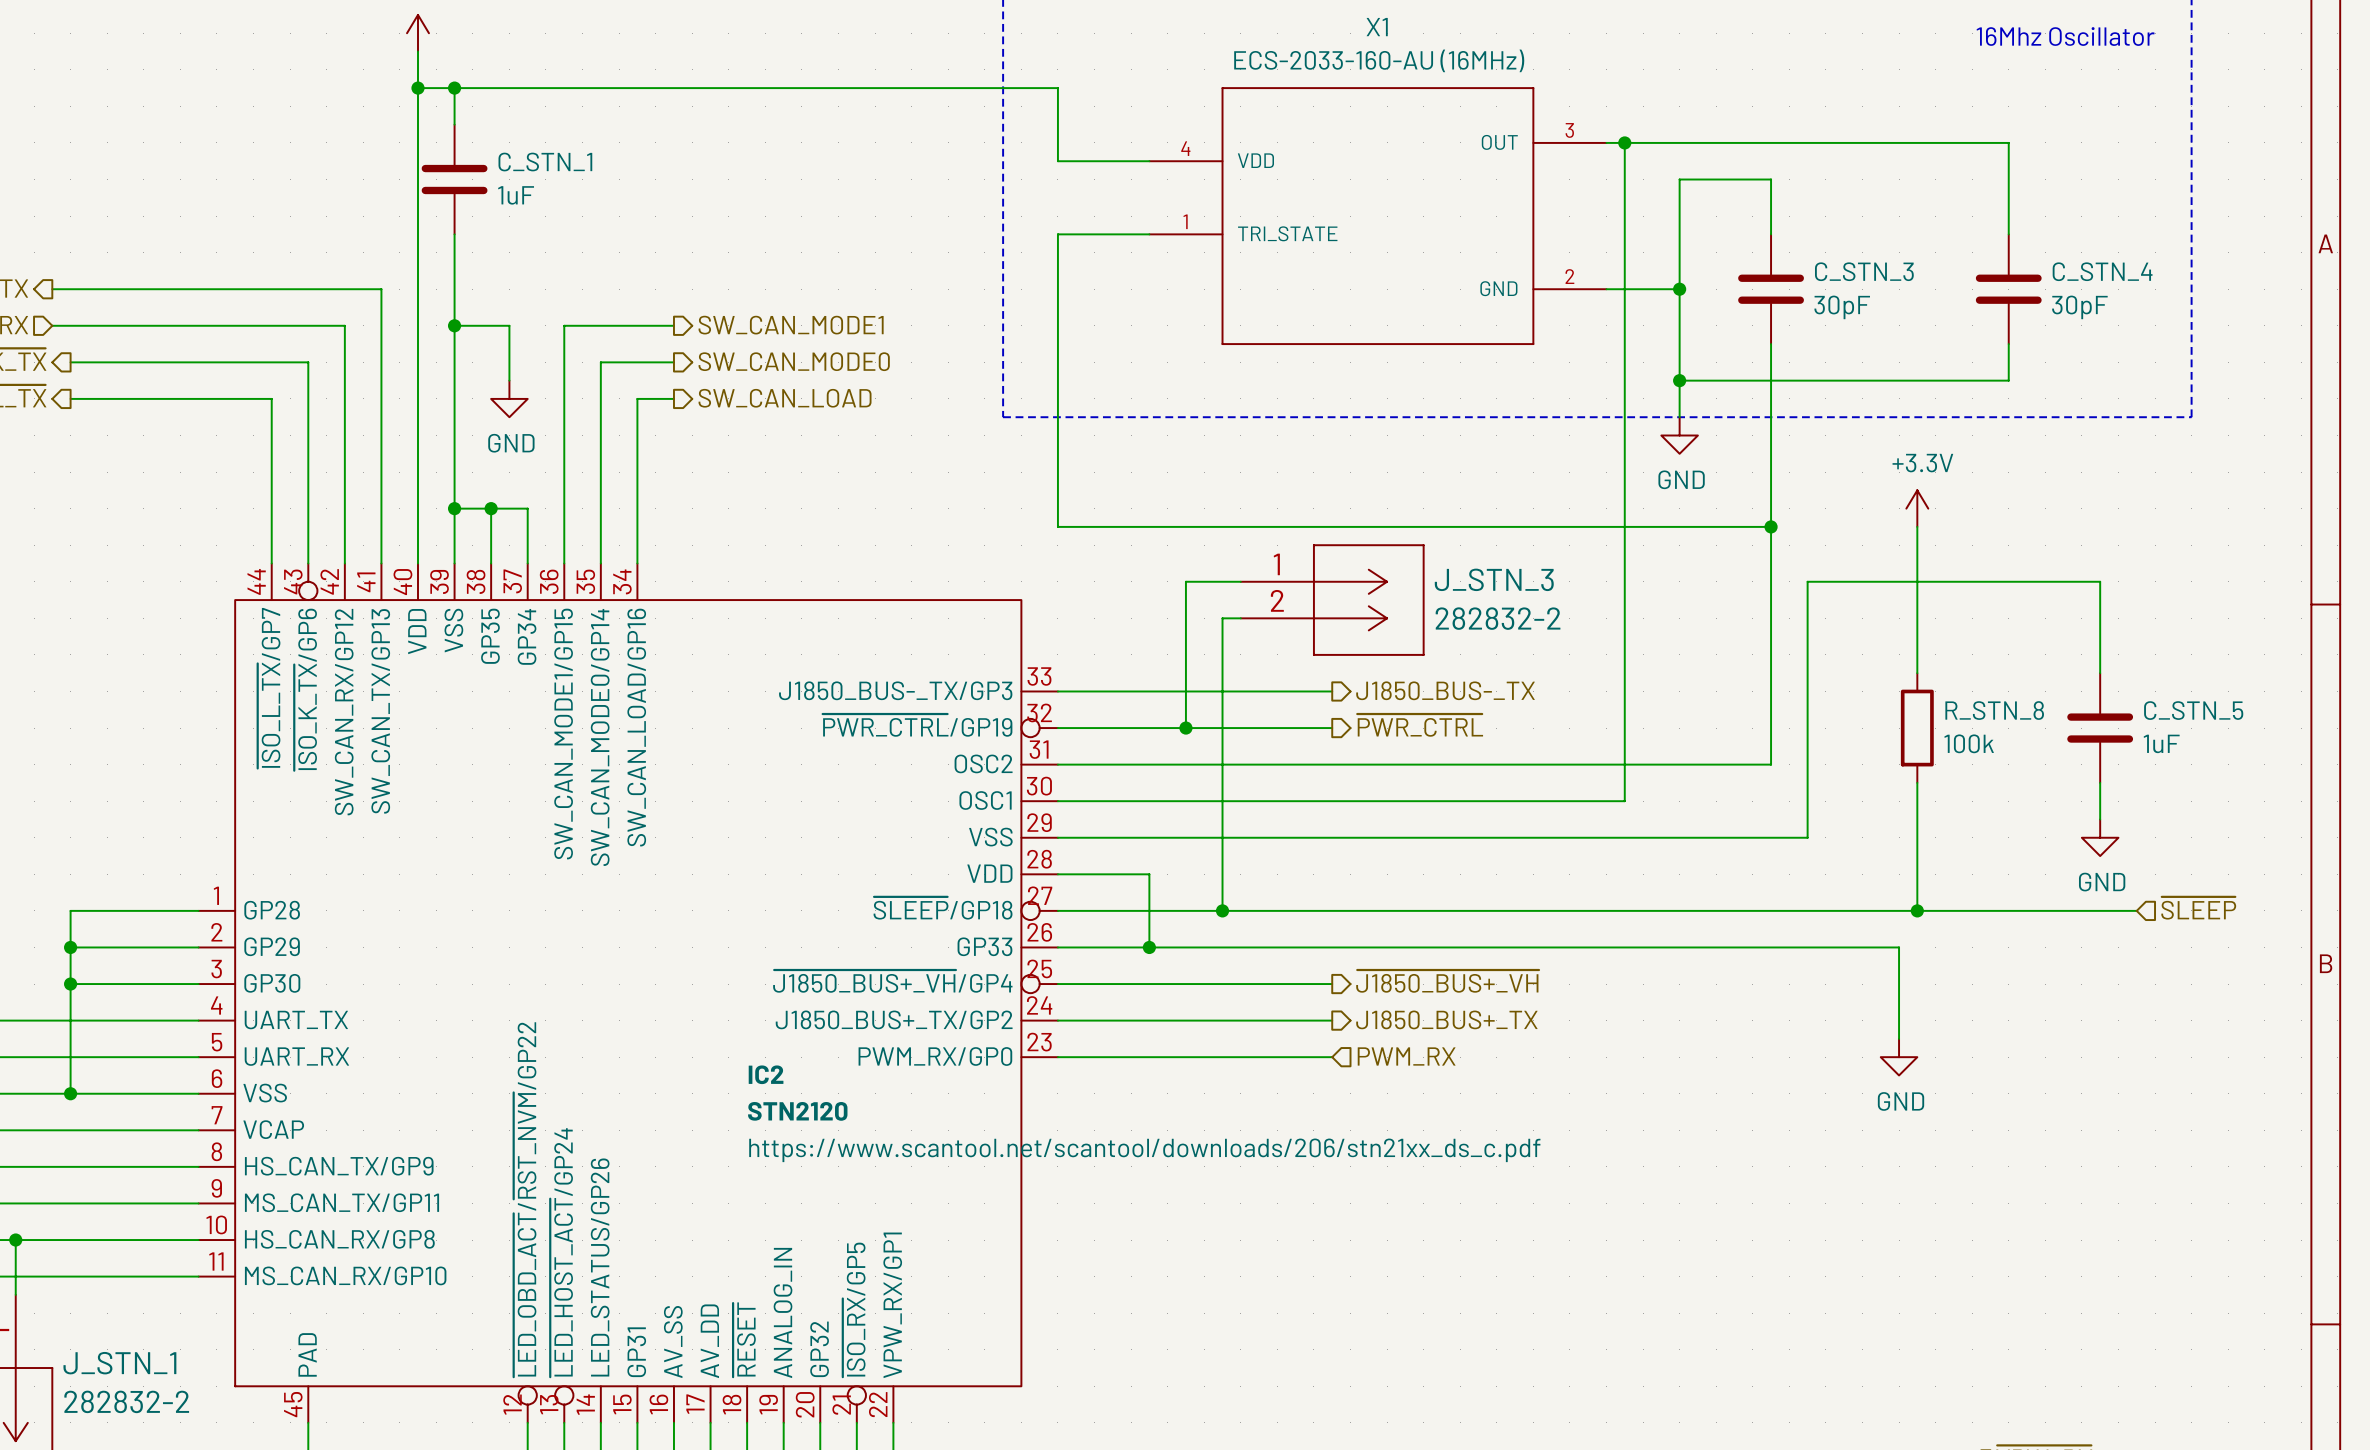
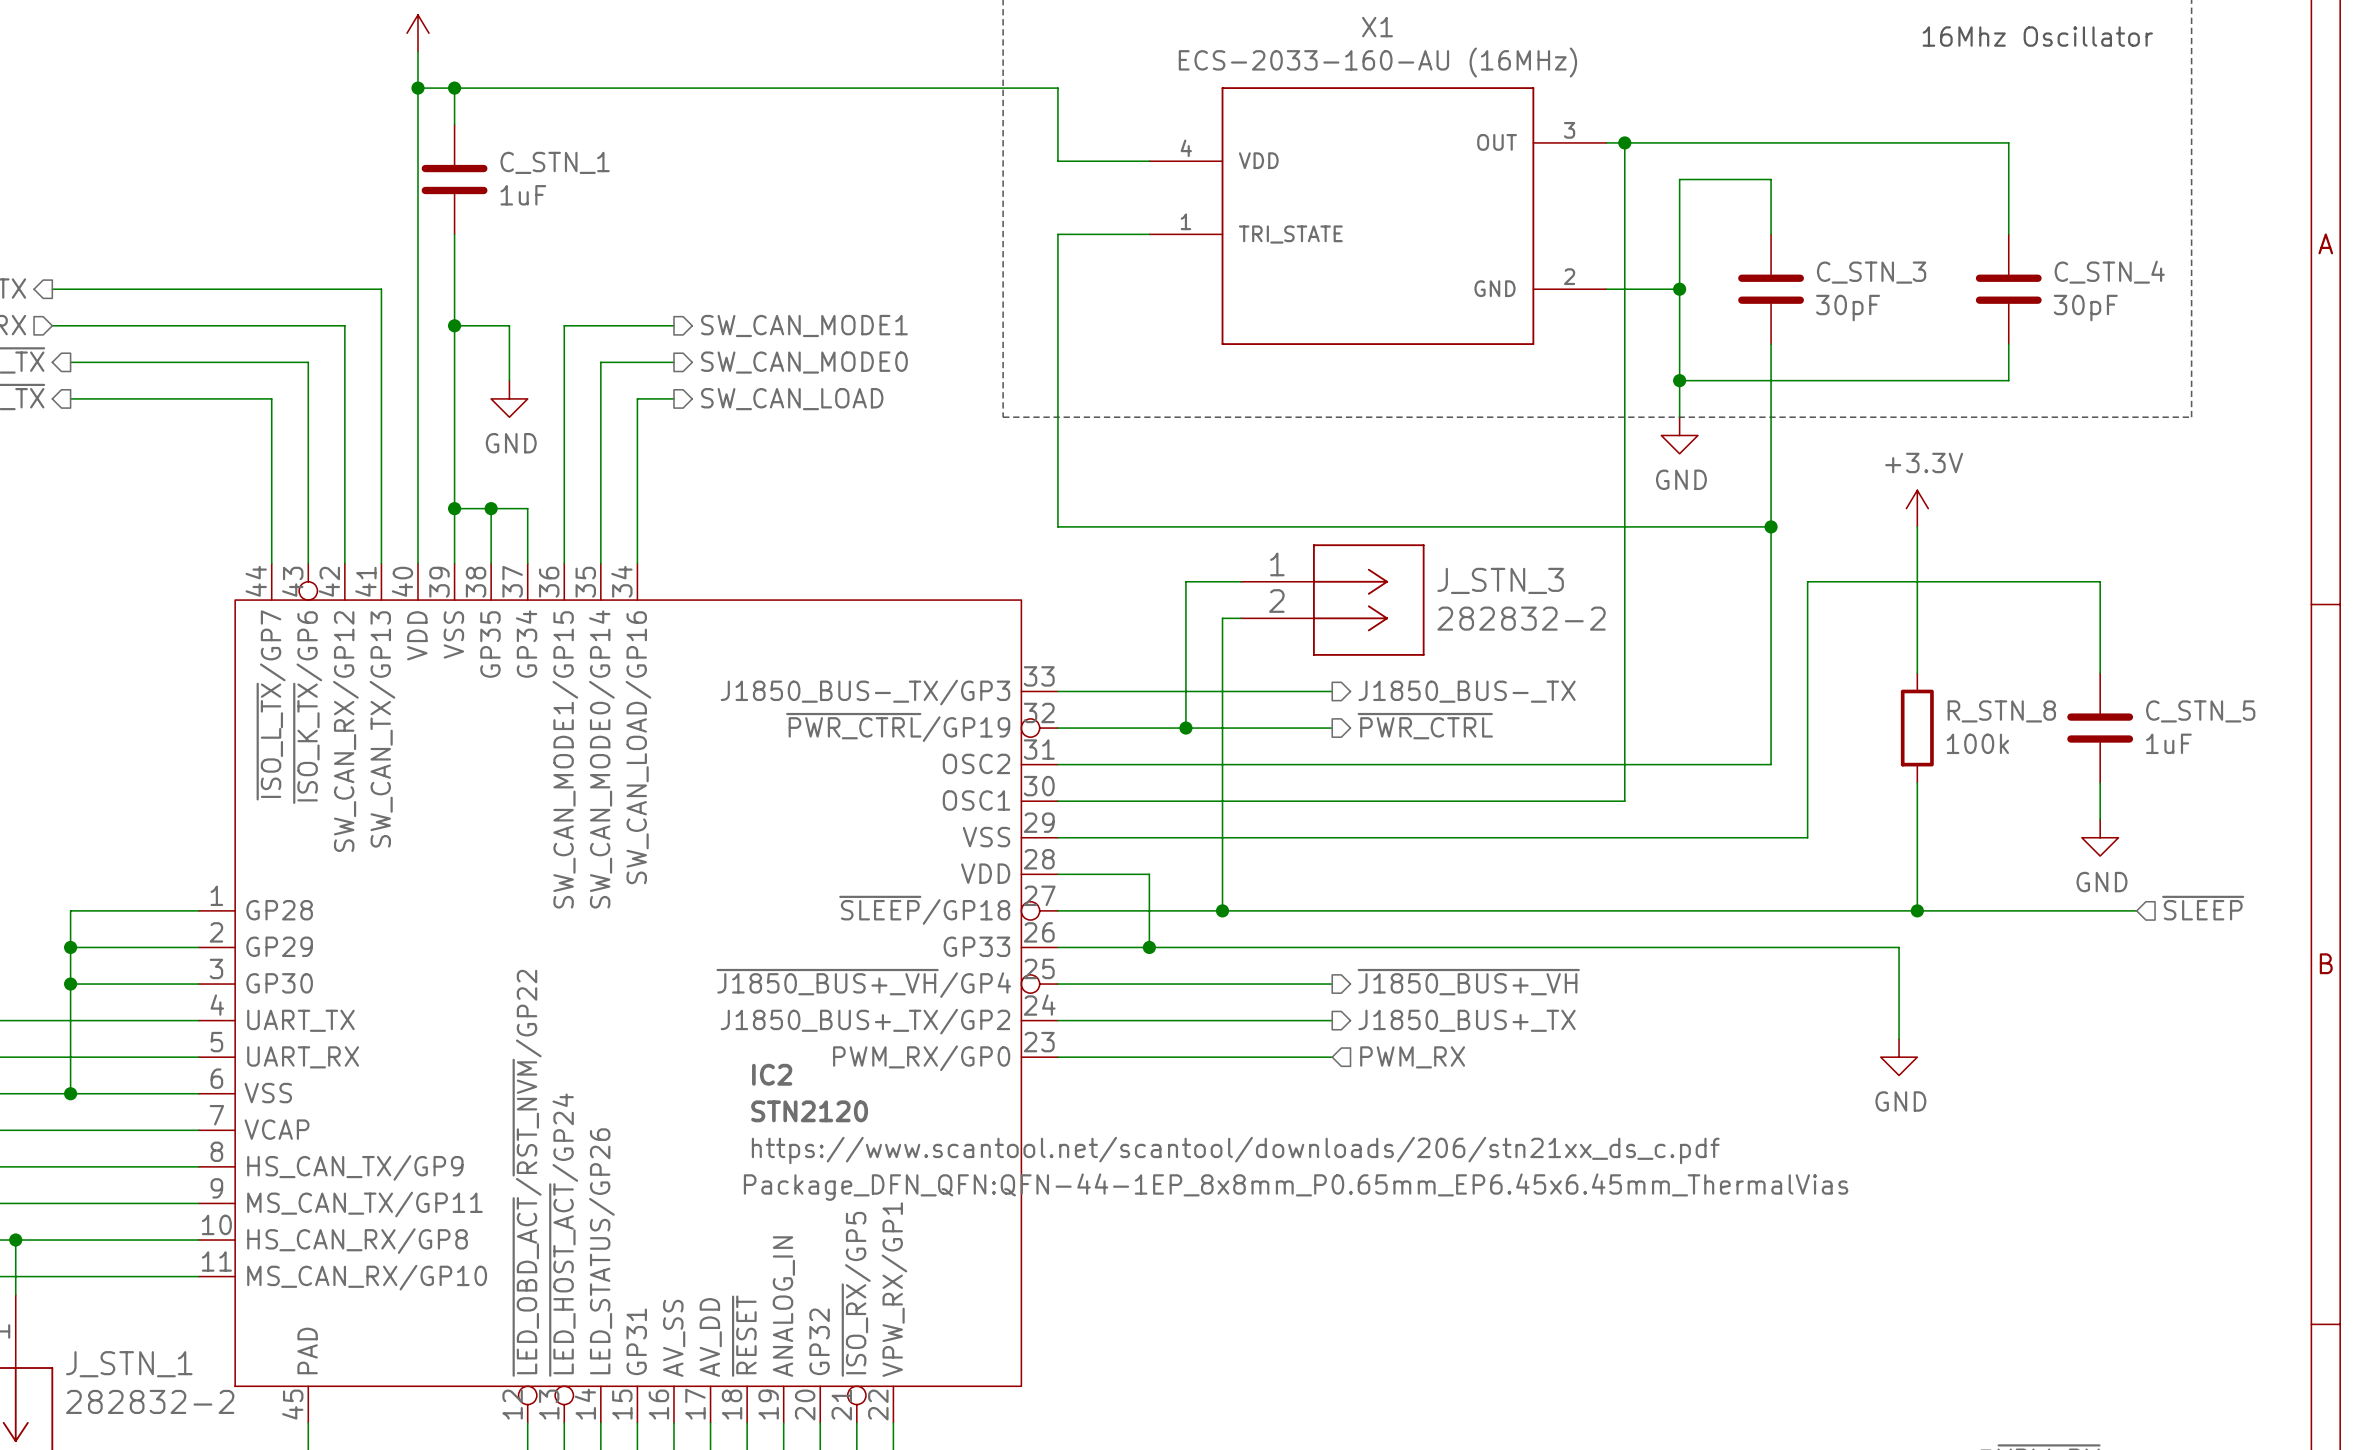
IC2 text: none -> Package_DFN_QFN:QFN-44-1EP_8x8mm_P0.65mm_EP6.45x6.45mm_ThermalVias (1296, 1187)

